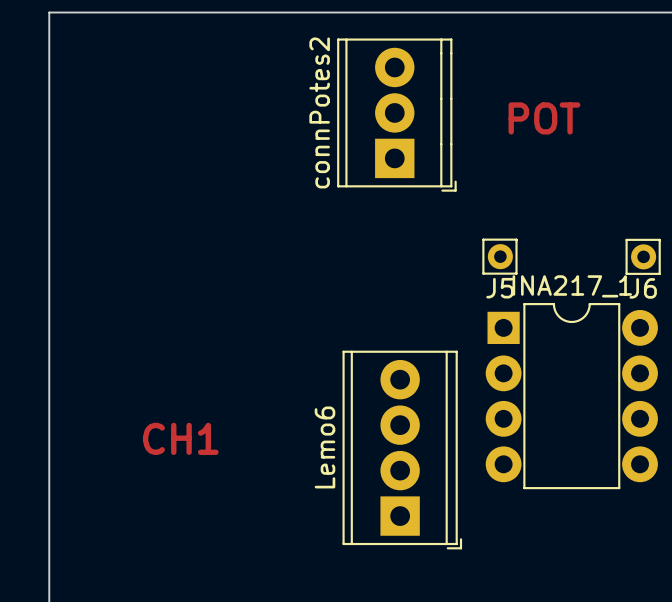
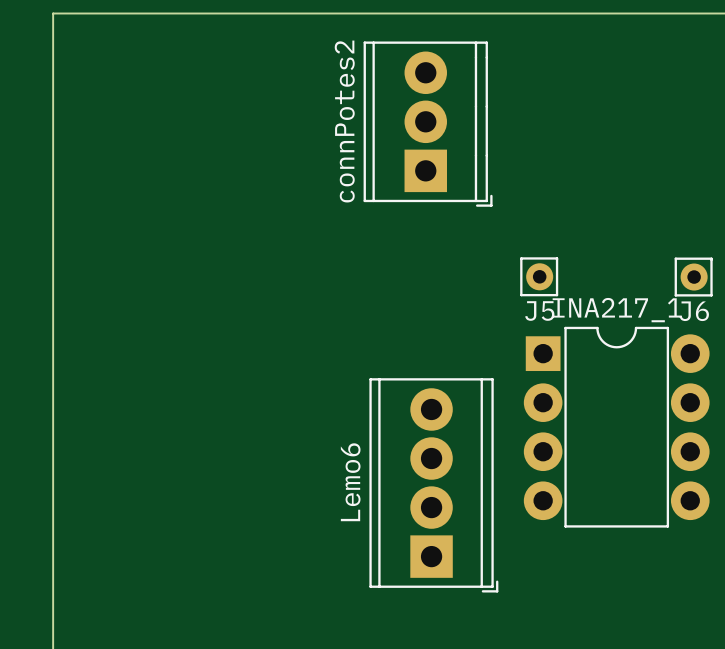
text: POT (544, 118) -> none
text: CH1 (180, 438) -> none

